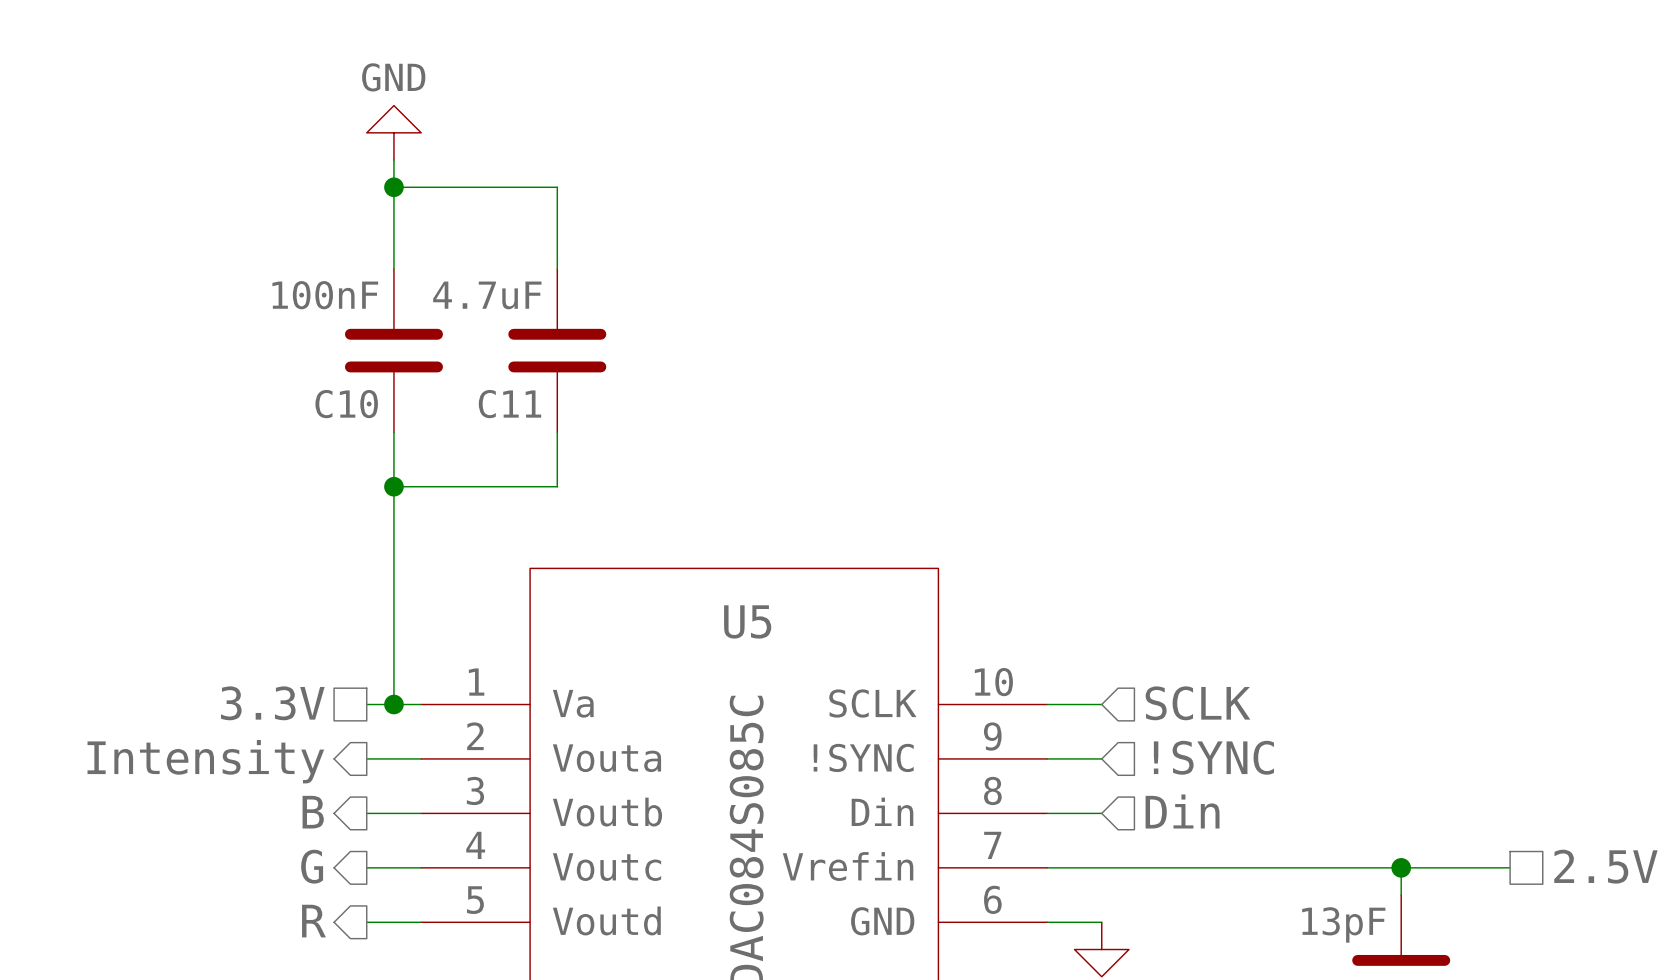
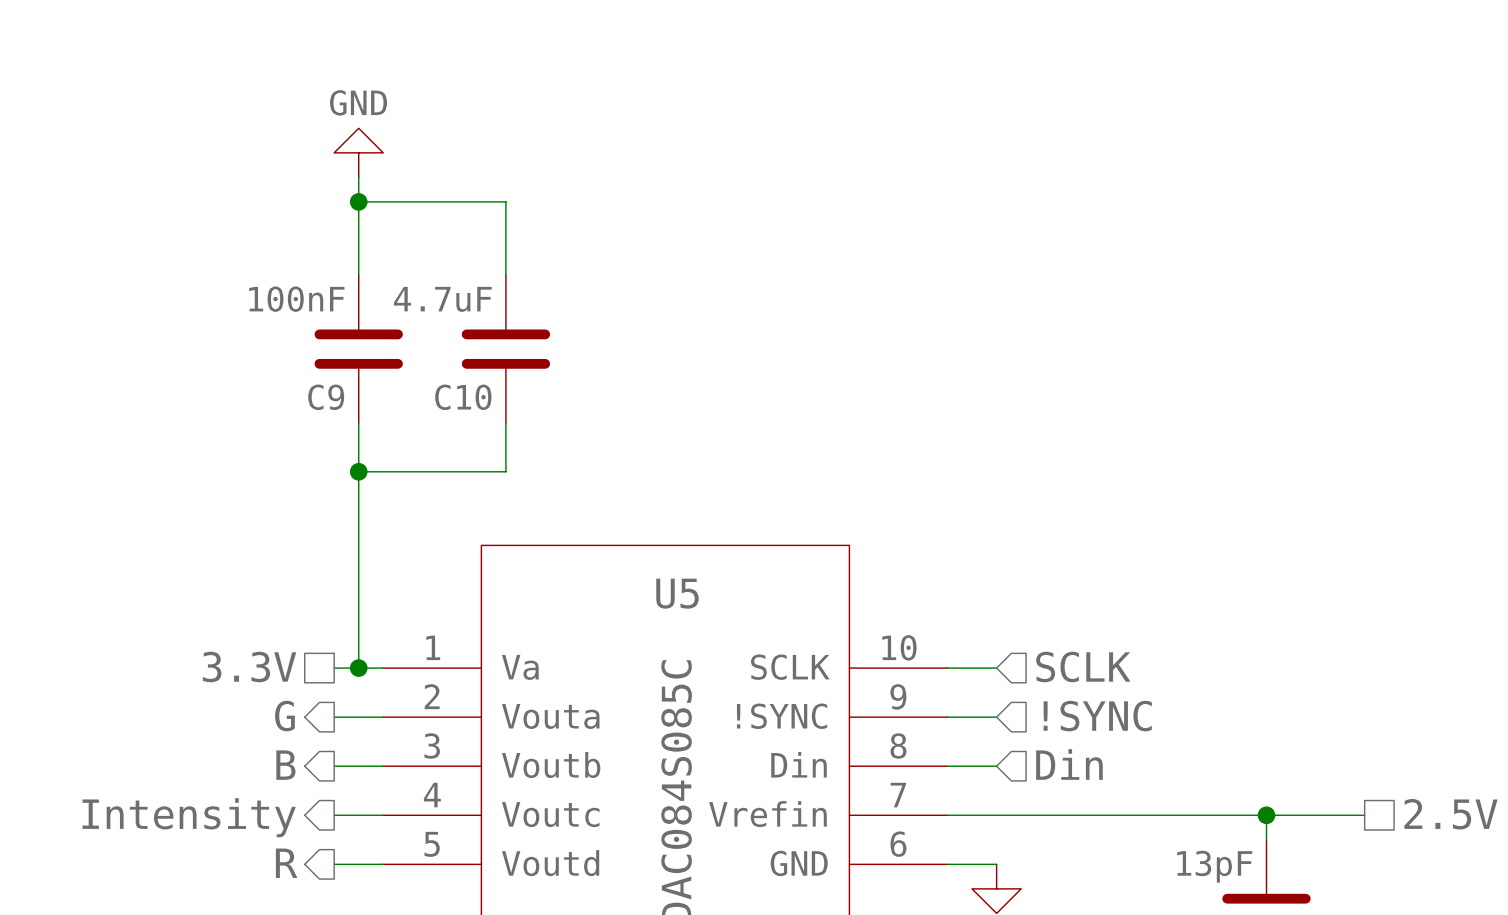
C10 name: C10 (346, 404) -> C9 (326, 397)
C11 name: C11 (509, 404) -> C10 (463, 397)
hierarchical label: Intensity (205, 761) -> G (284, 716)
hierarchical label: G (312, 866) -> Intensity (189, 817)

